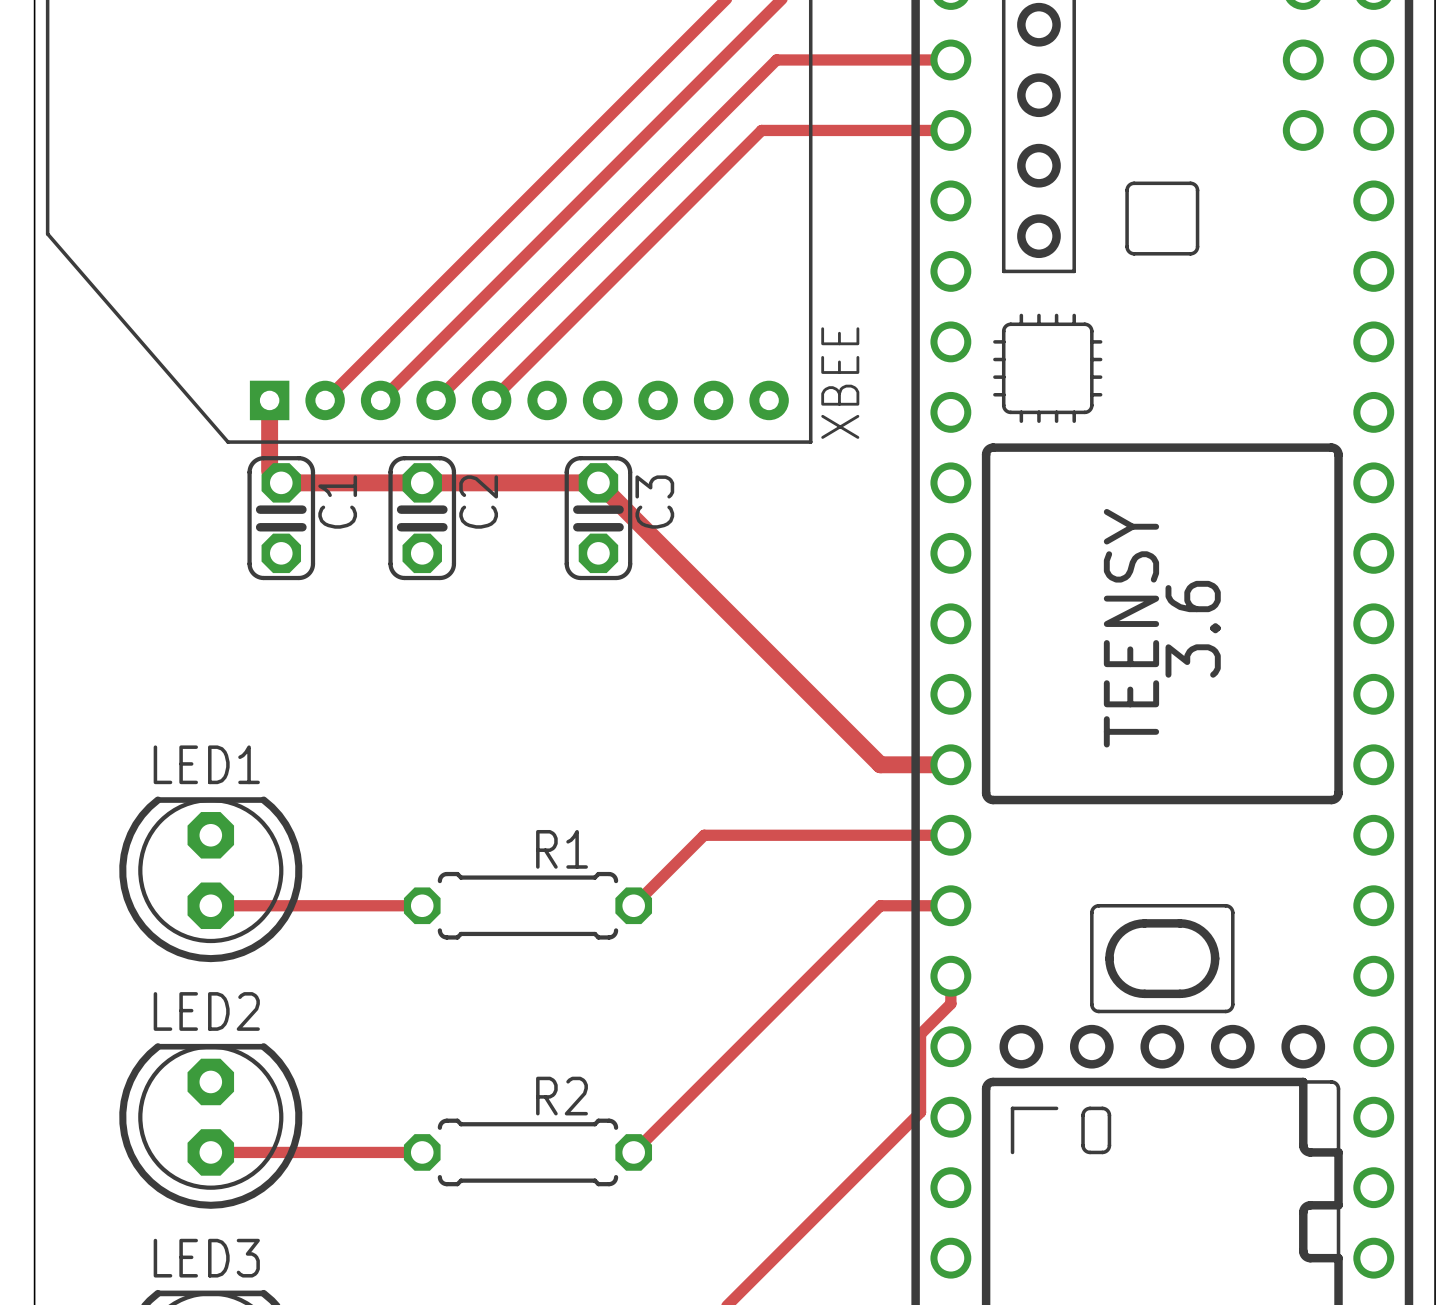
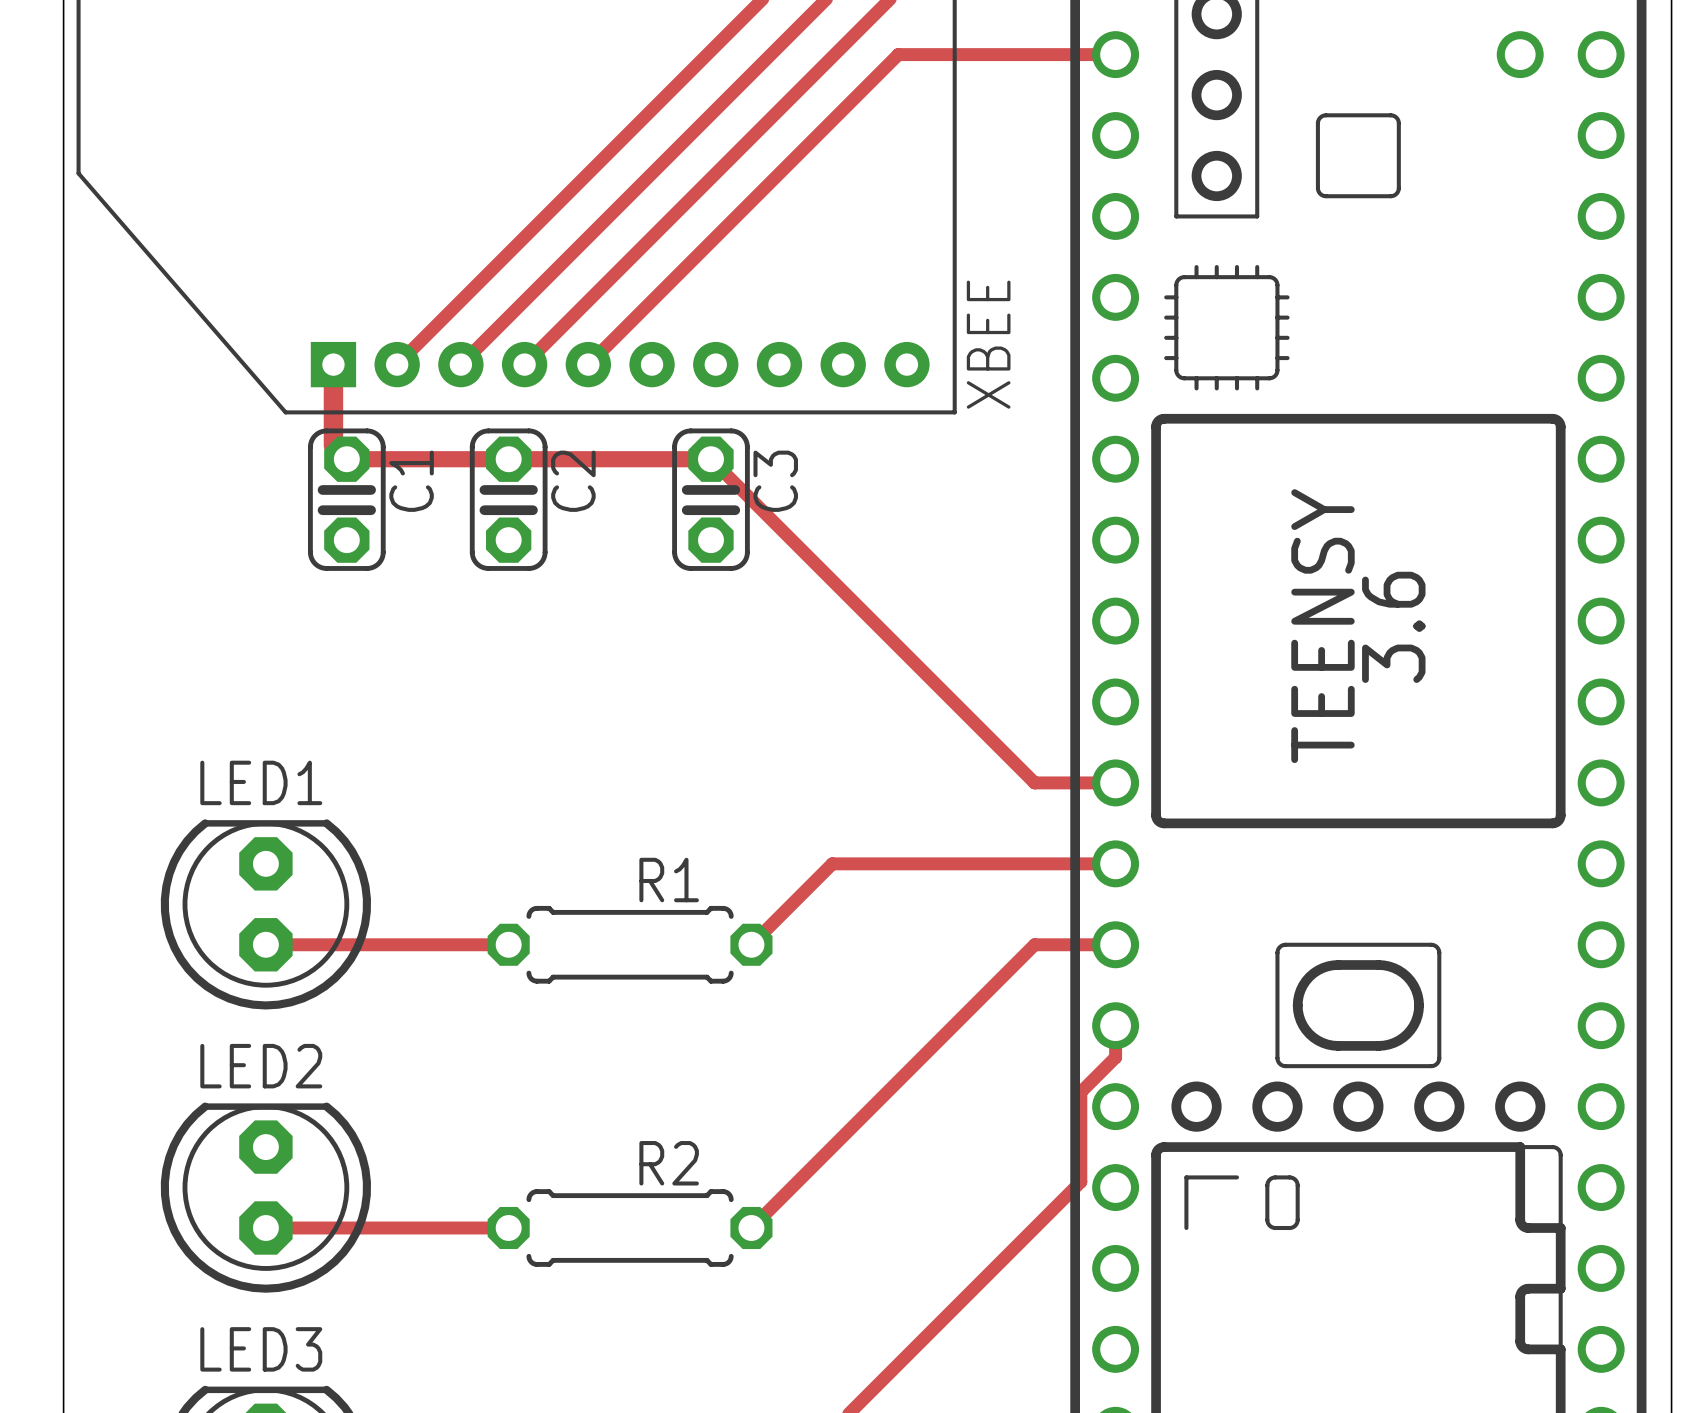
track width: thick (281, 482) (598, 482) (880, 764) (950, 764) -> thin (346, 459) (710, 459) (1034, 782) (1115, 782)

